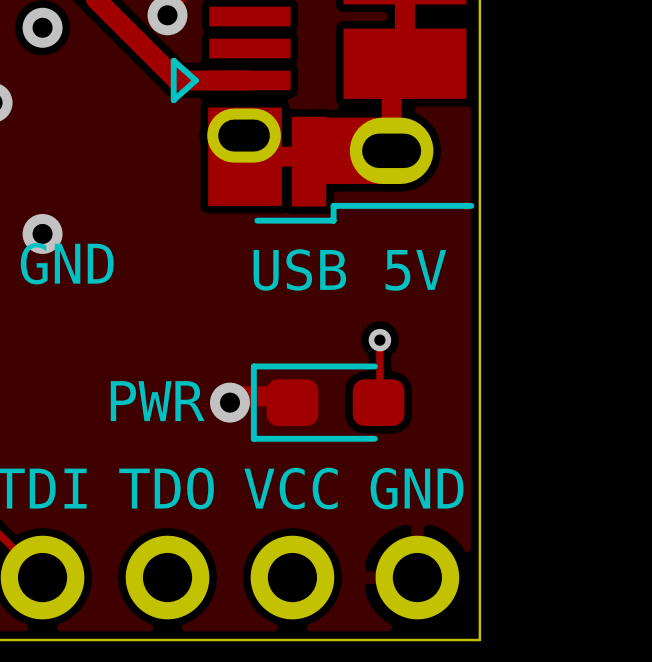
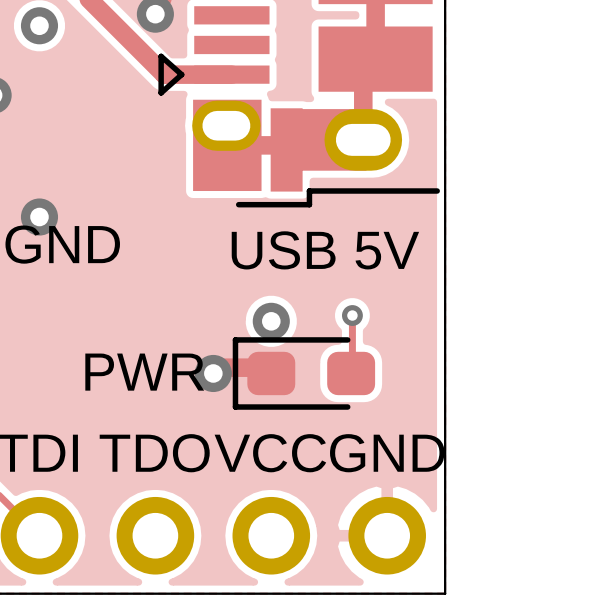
via: none -> (271, 321)

